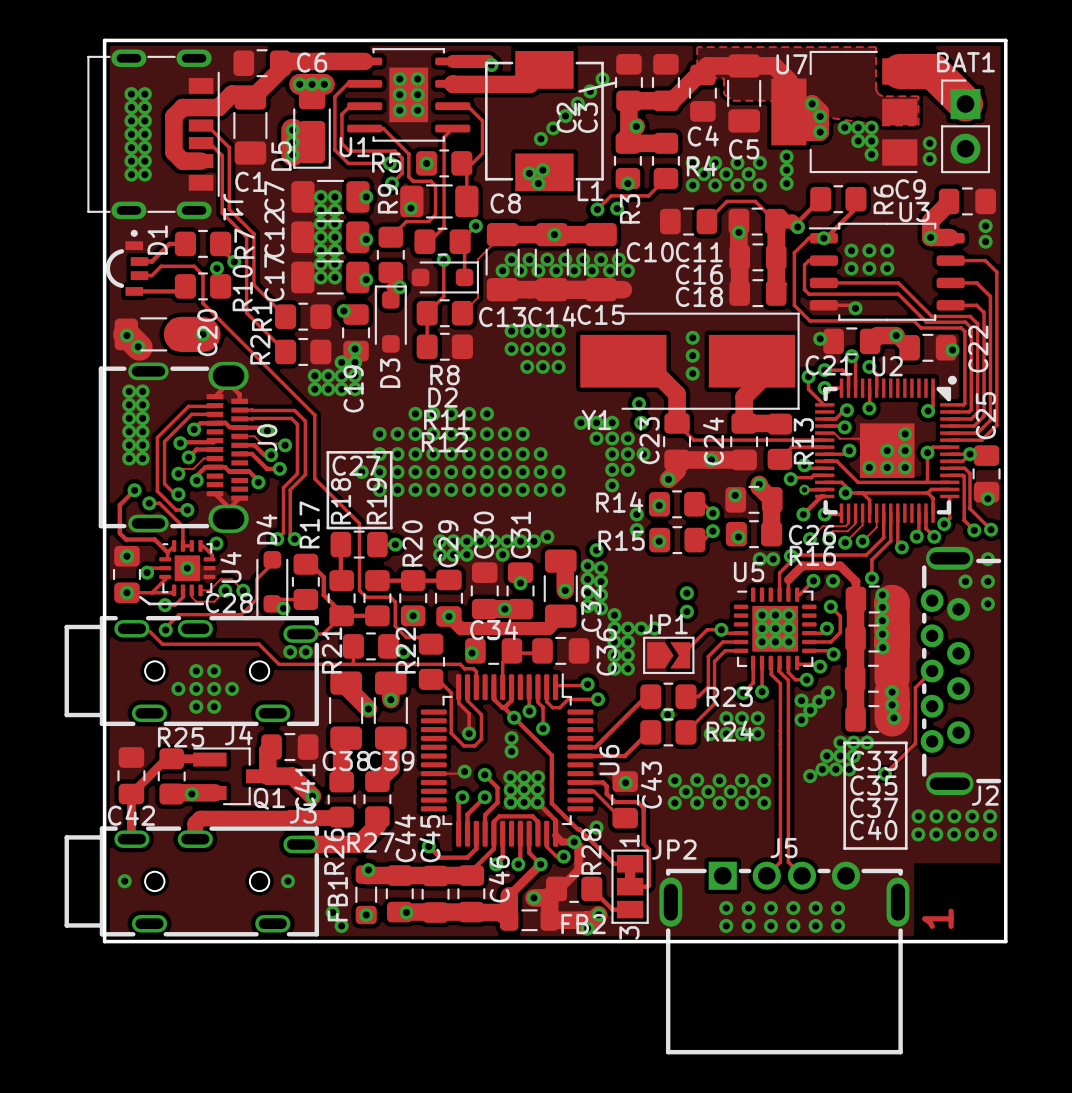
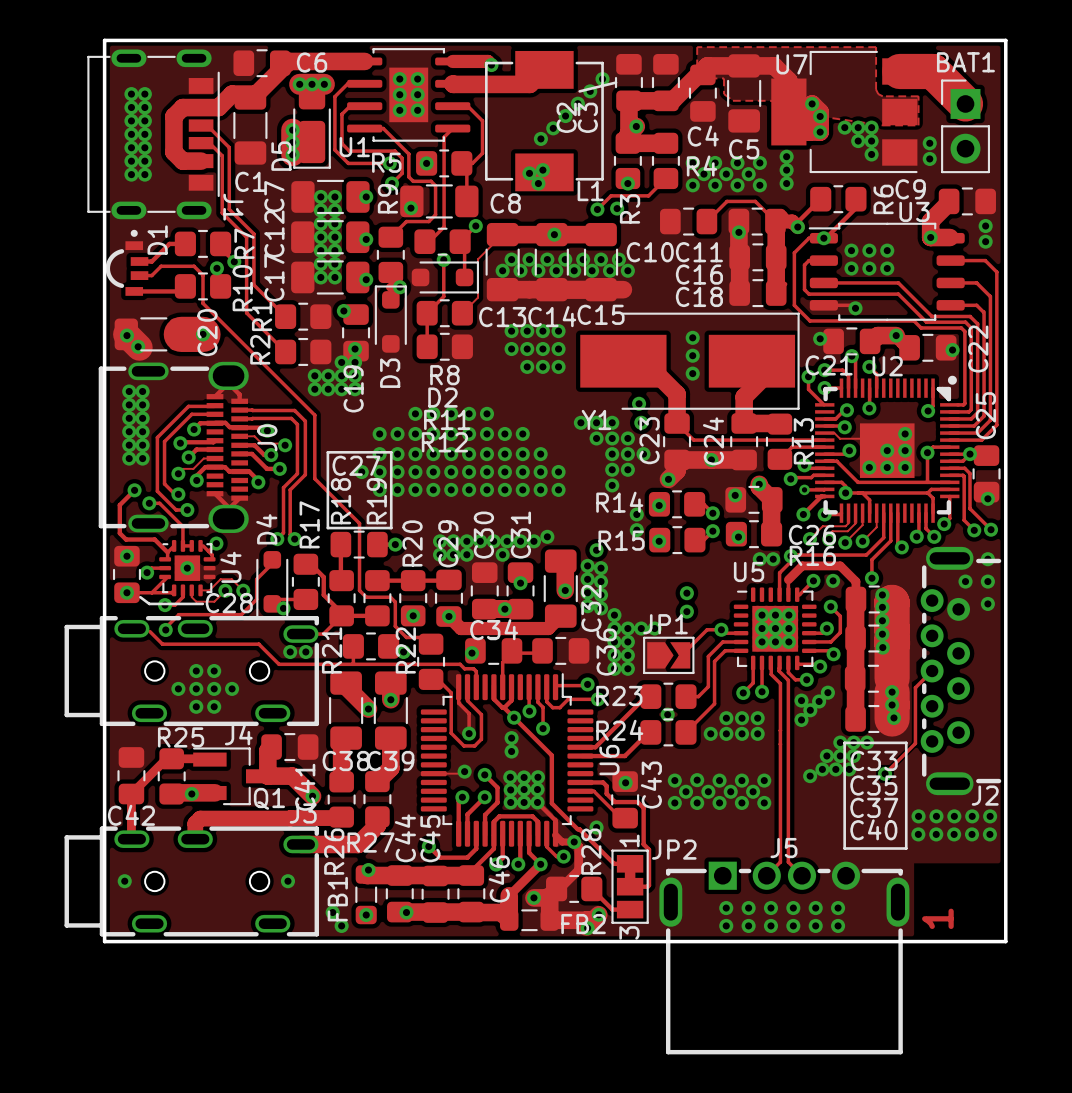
R23 name position: R23 (729, 696) -> R23 (619, 695)
R24 name position: R24 (730, 731) -> R24 (619, 730)

